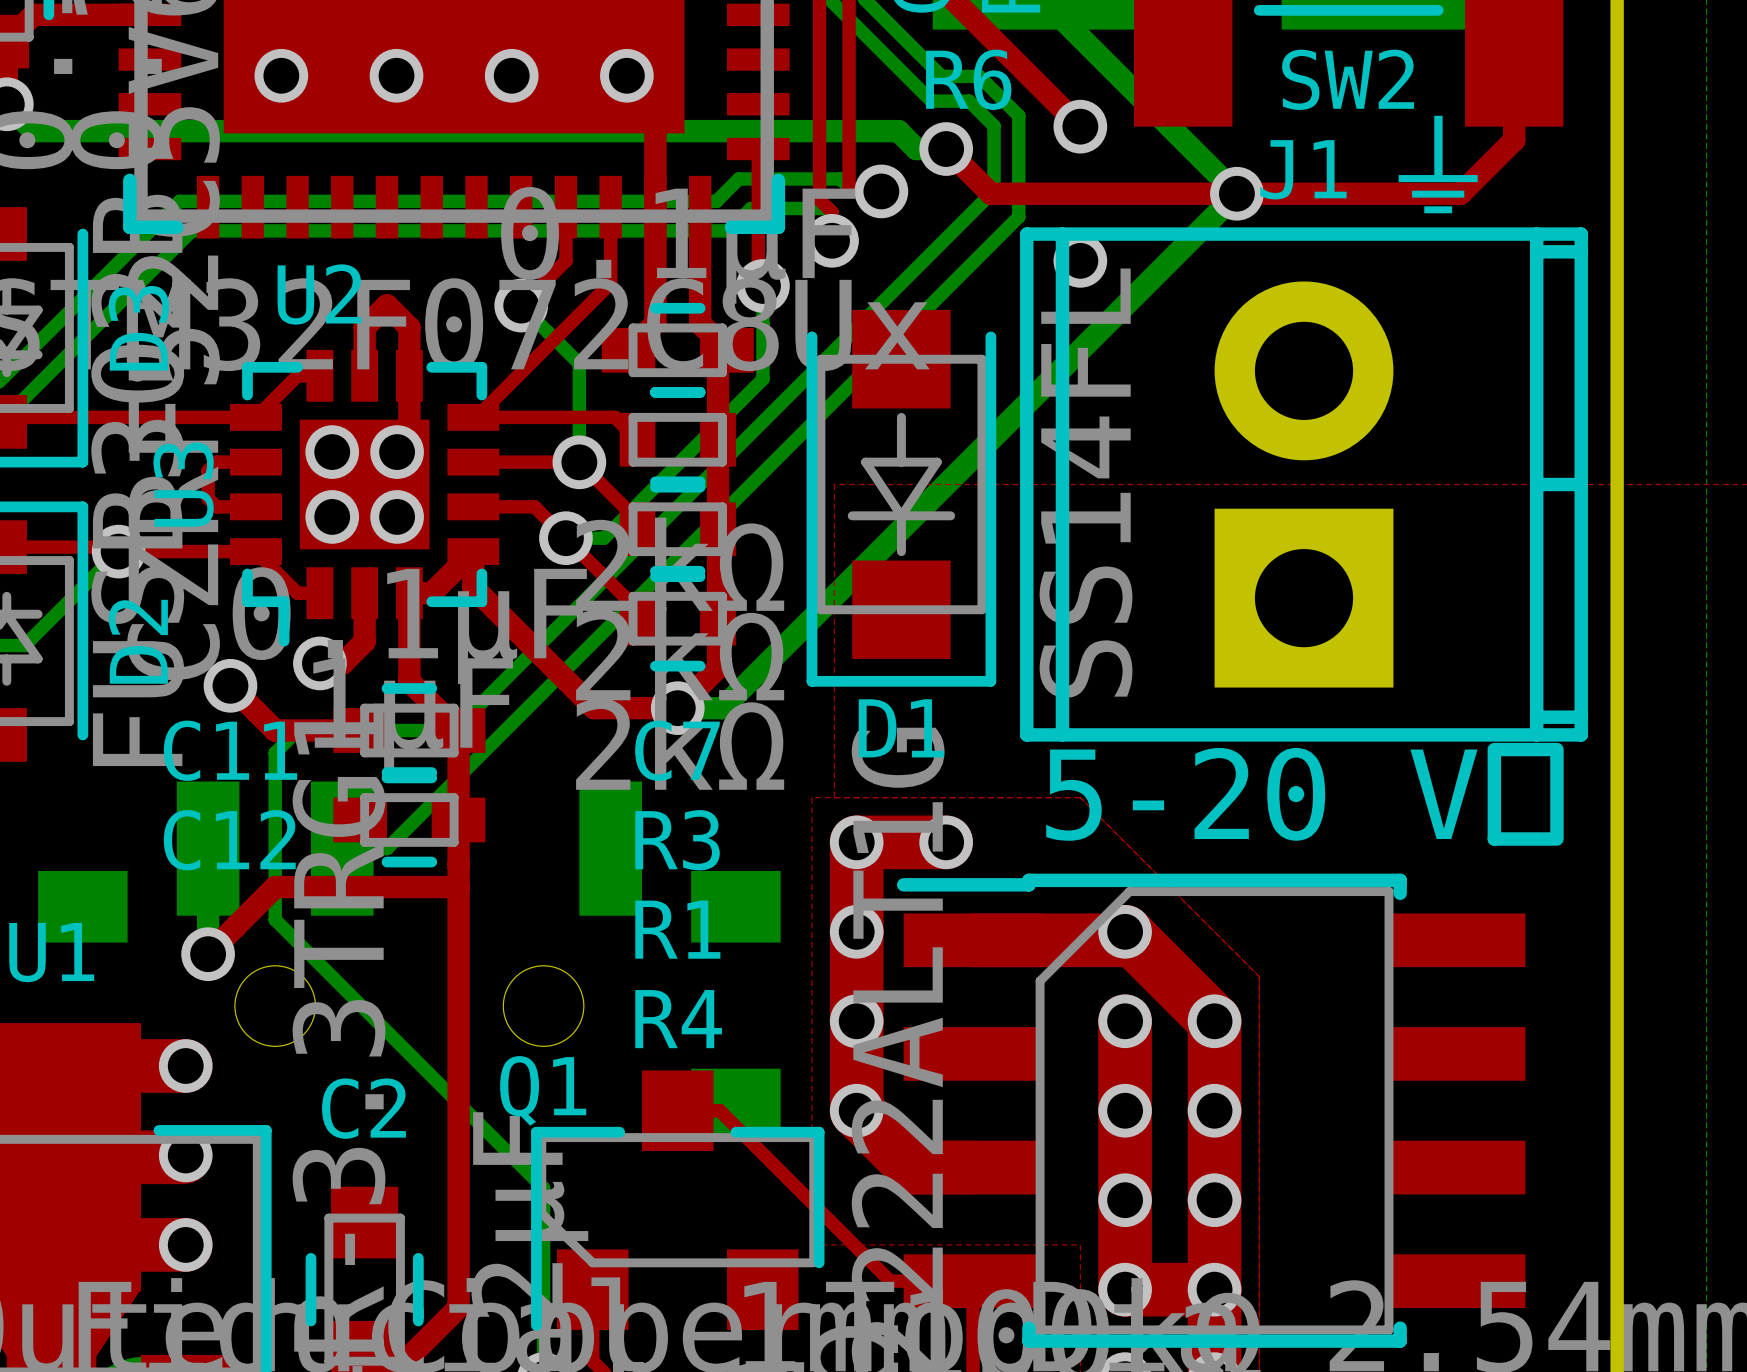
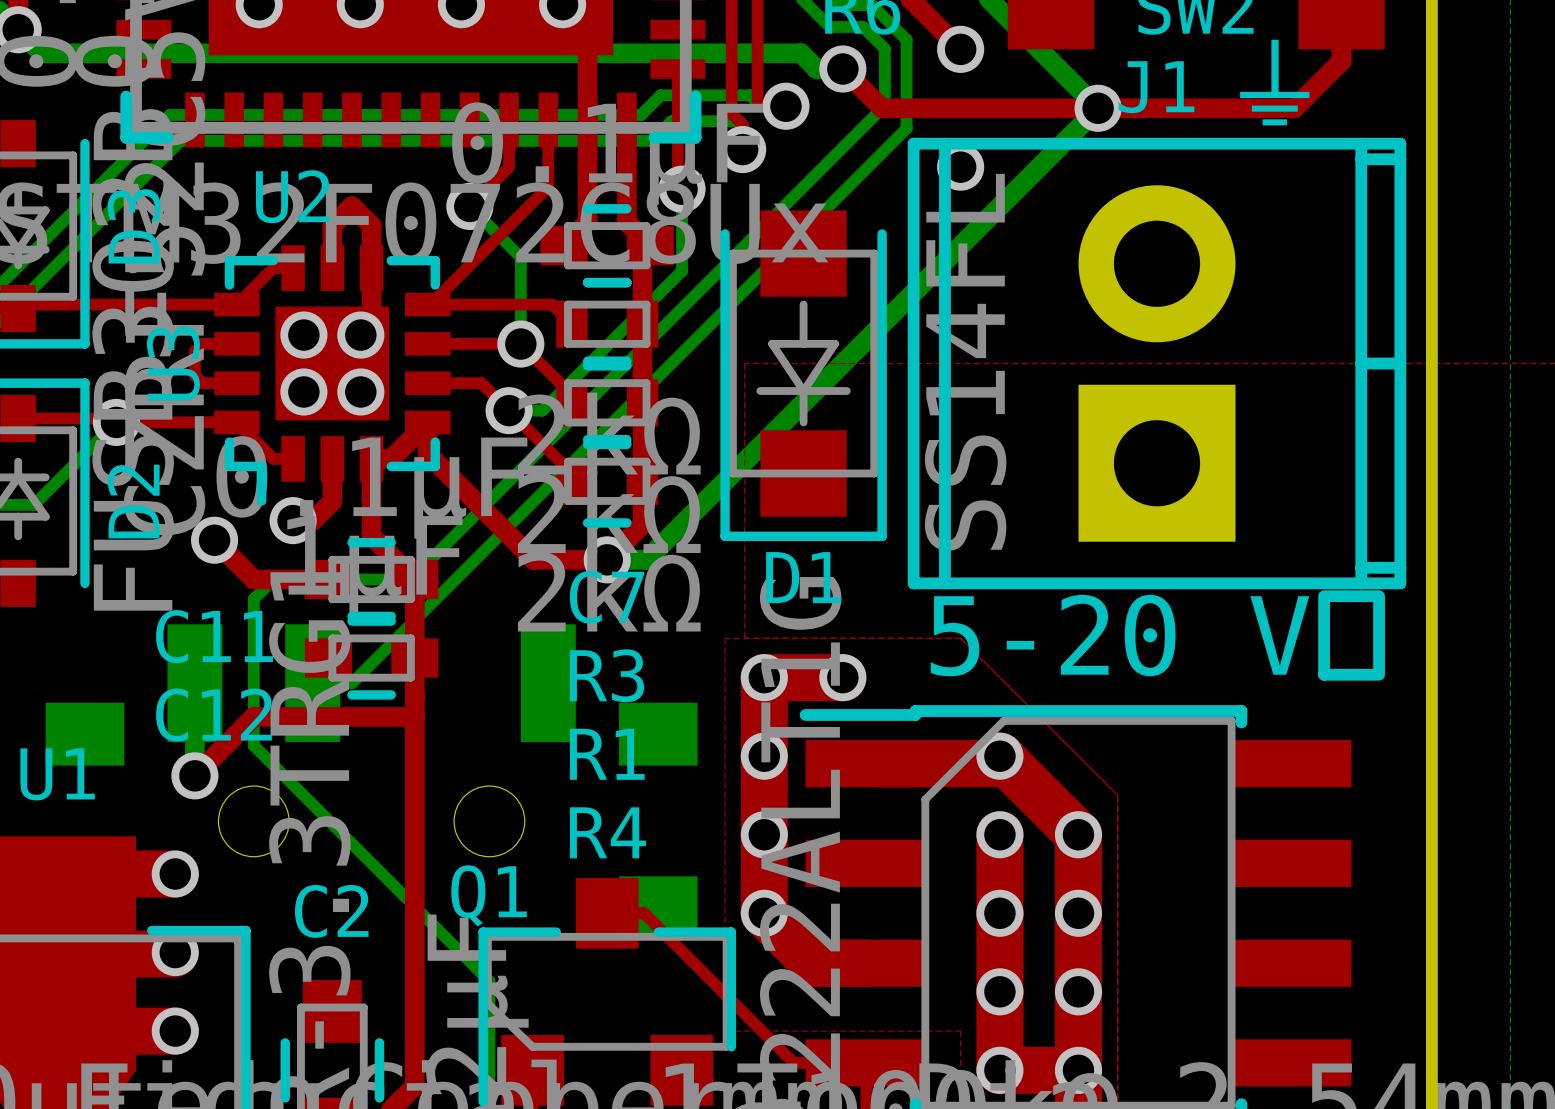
C11 name position: C11 (230, 750) -> C11 (214, 636)
C12 name position: C12 (229, 840) -> C12 (213, 715)

